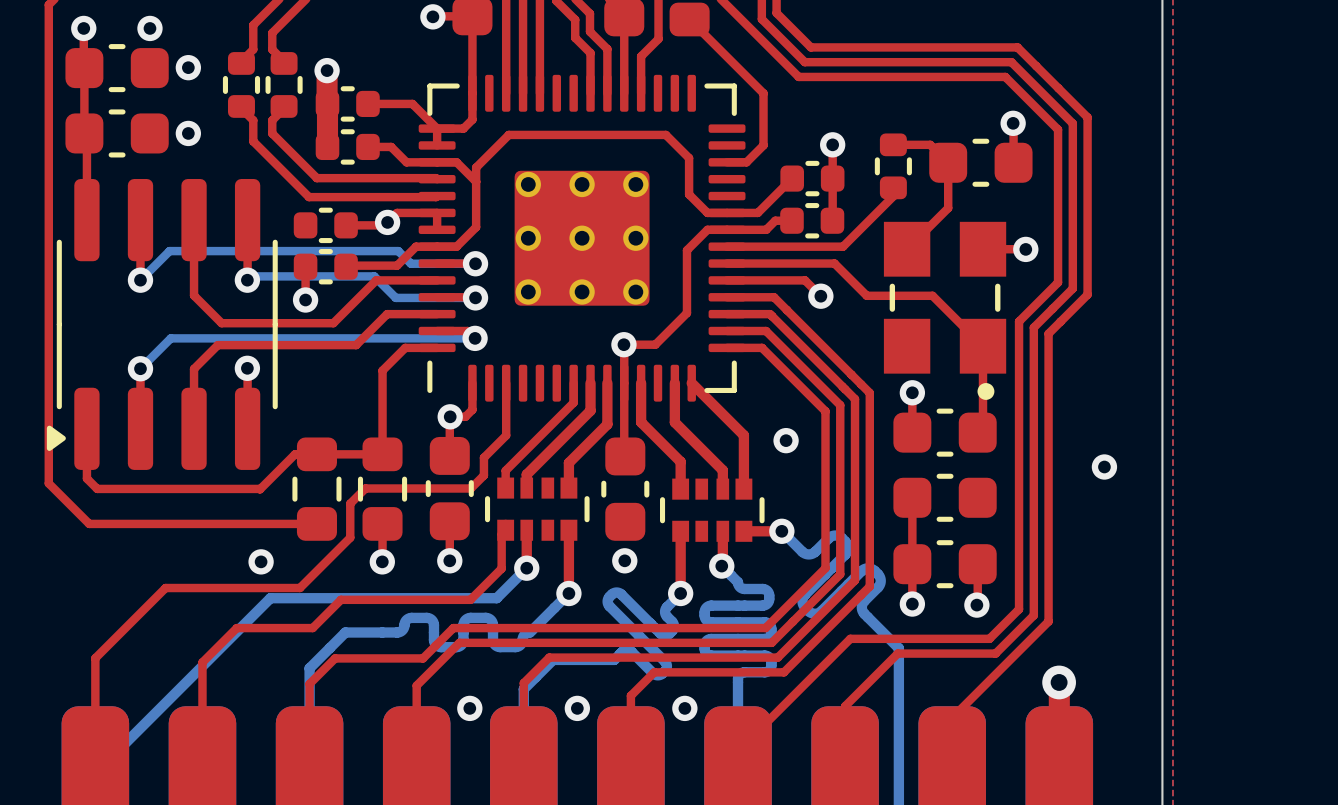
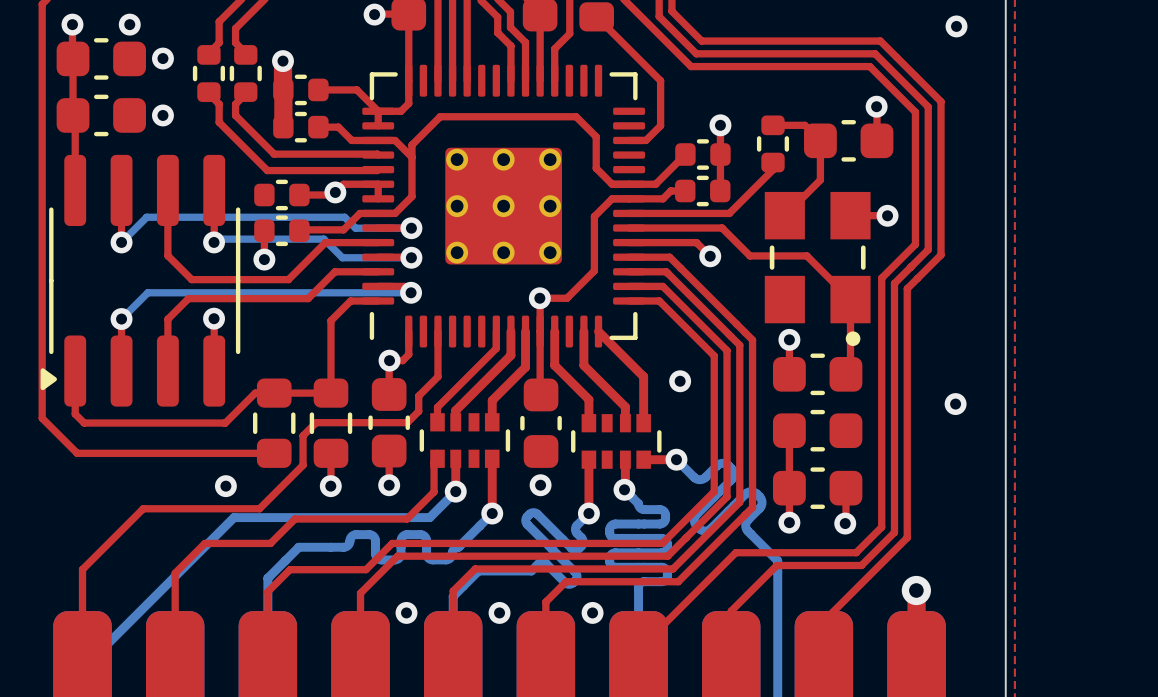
via: none -> (956, 26)

